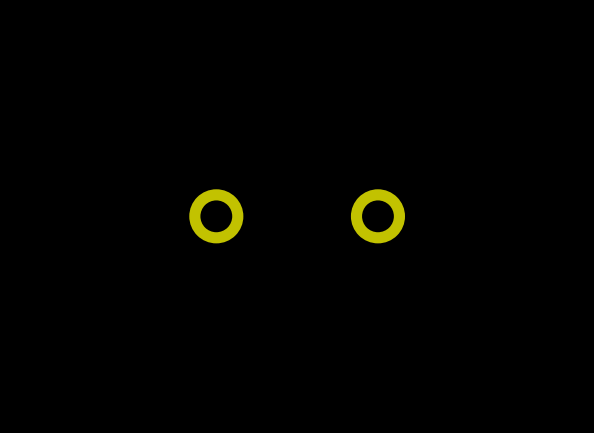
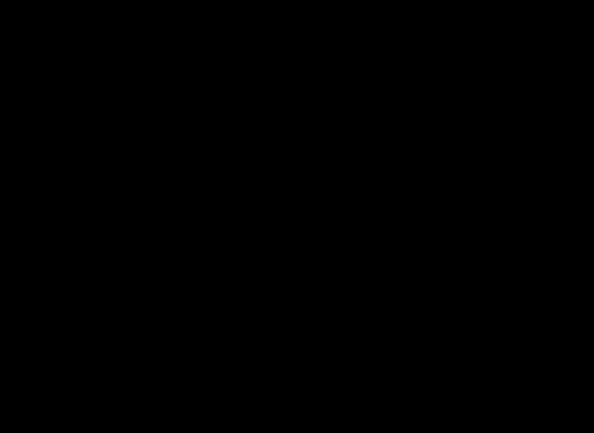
part: (297, 216) -> none

